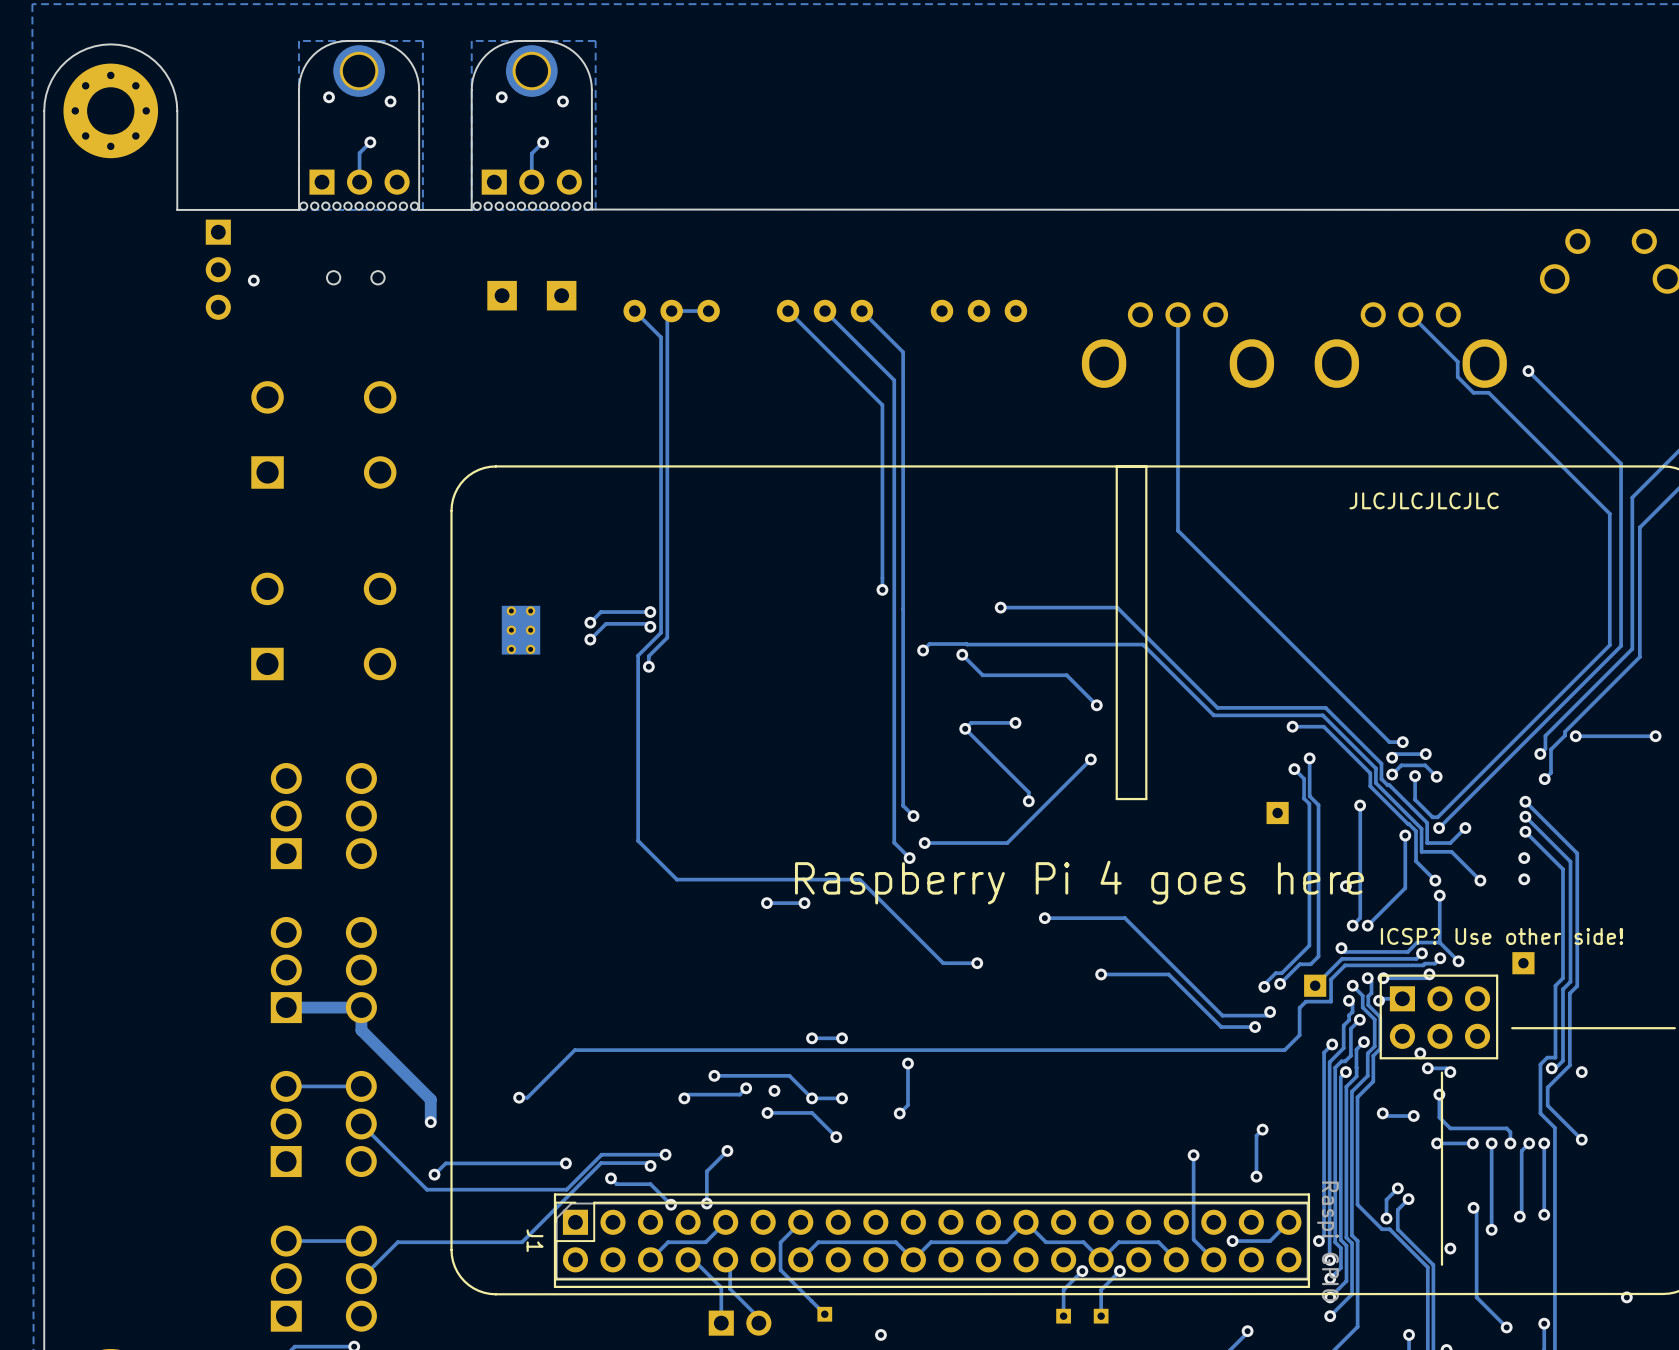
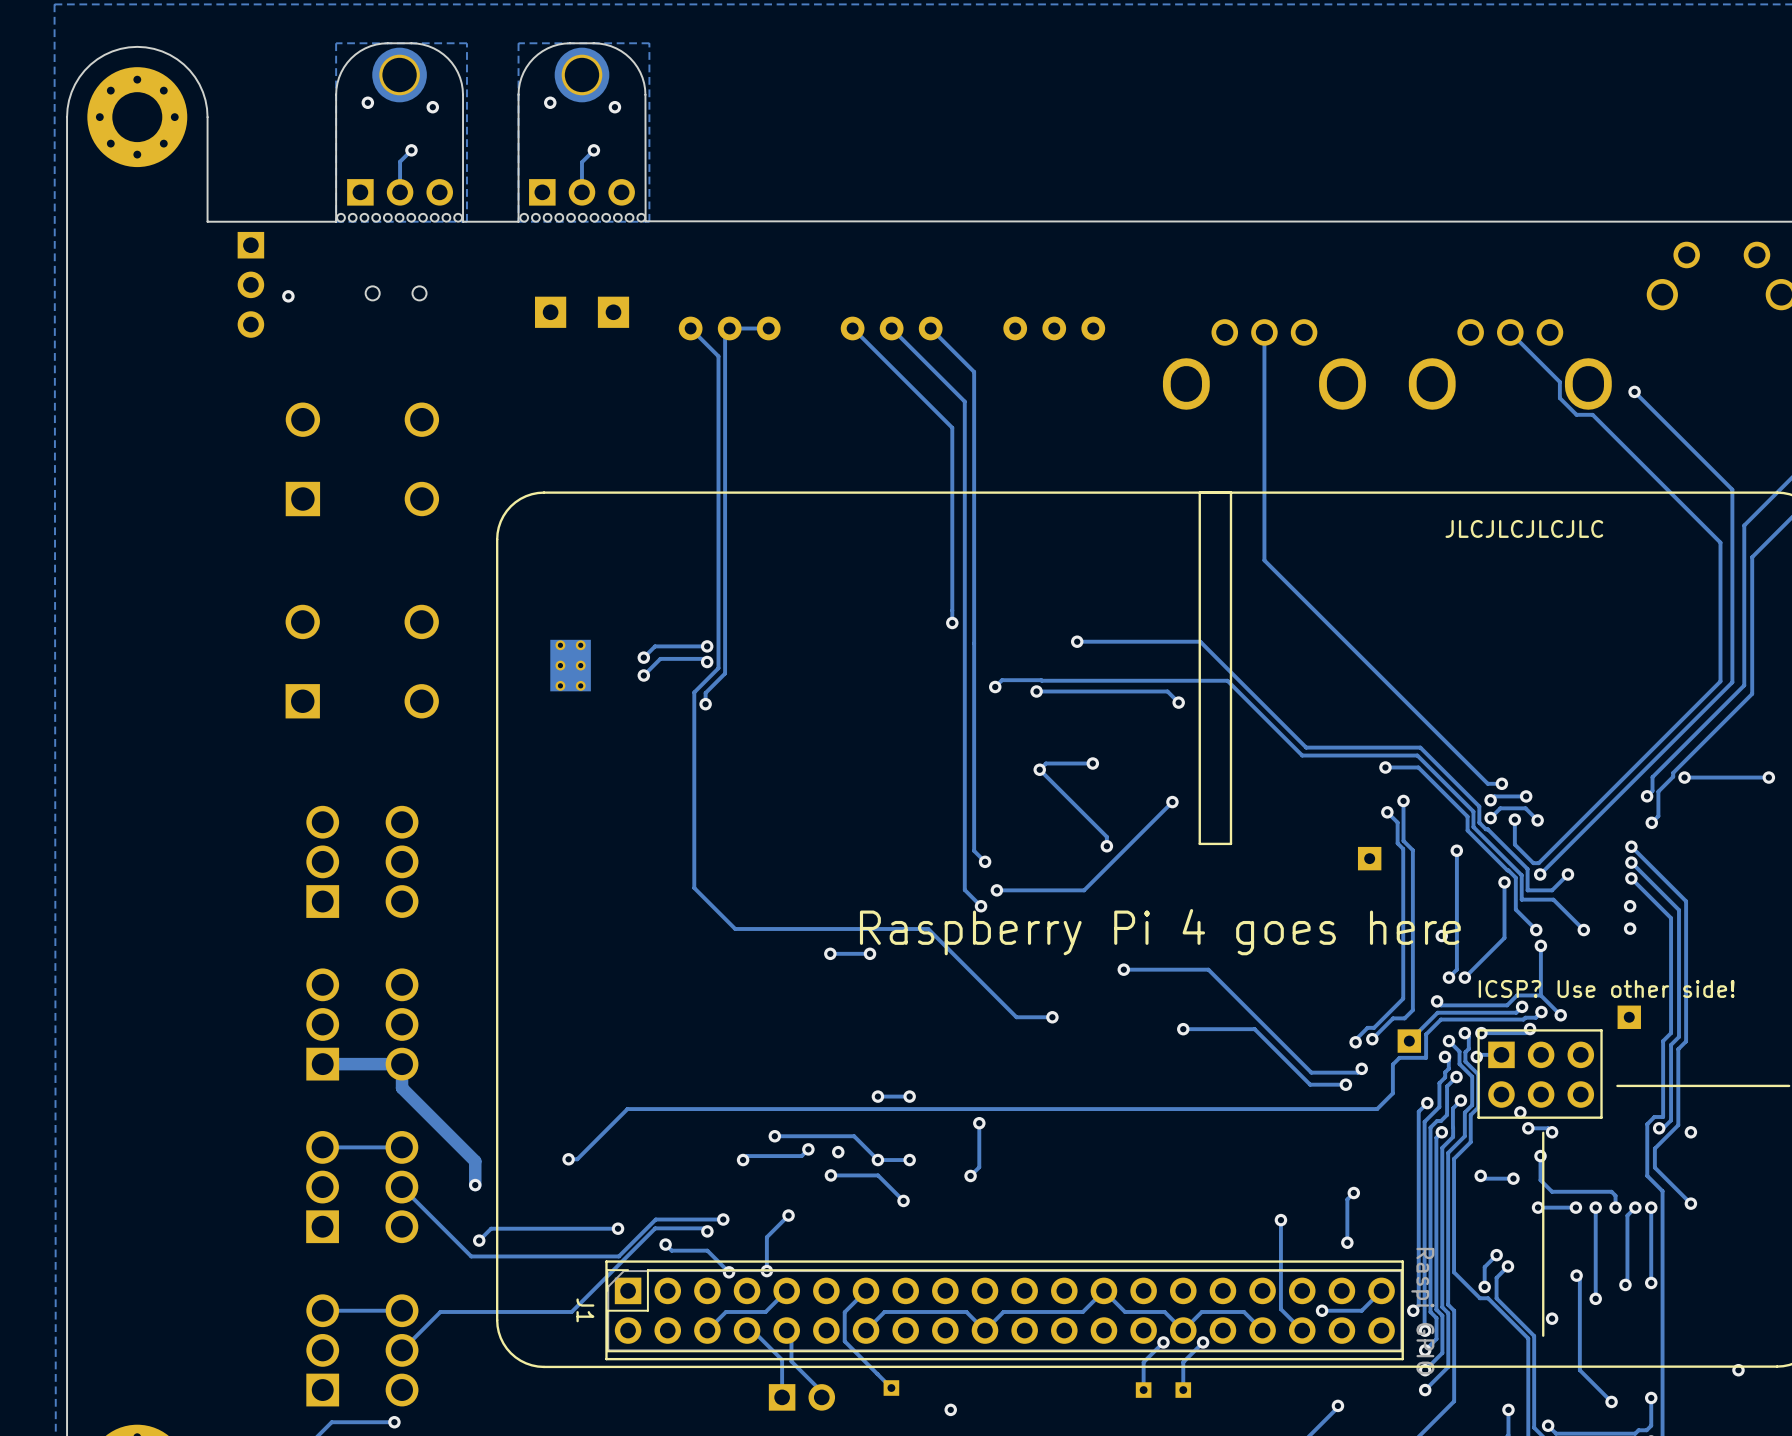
track: (962, 654) (982, 675) (1066, 675) (1096, 705) -> (1036, 691) (1167, 691) (1178, 702)
via position: (1096, 705) -> (1178, 702)

